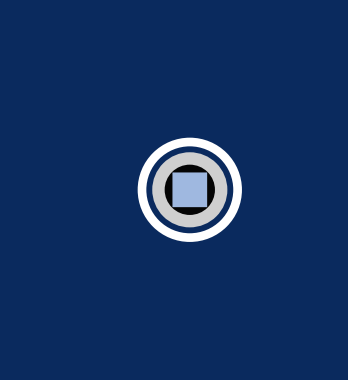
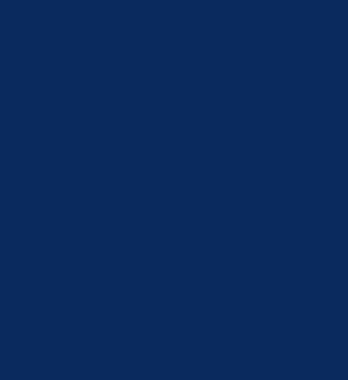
part: (189, 189) -> none

